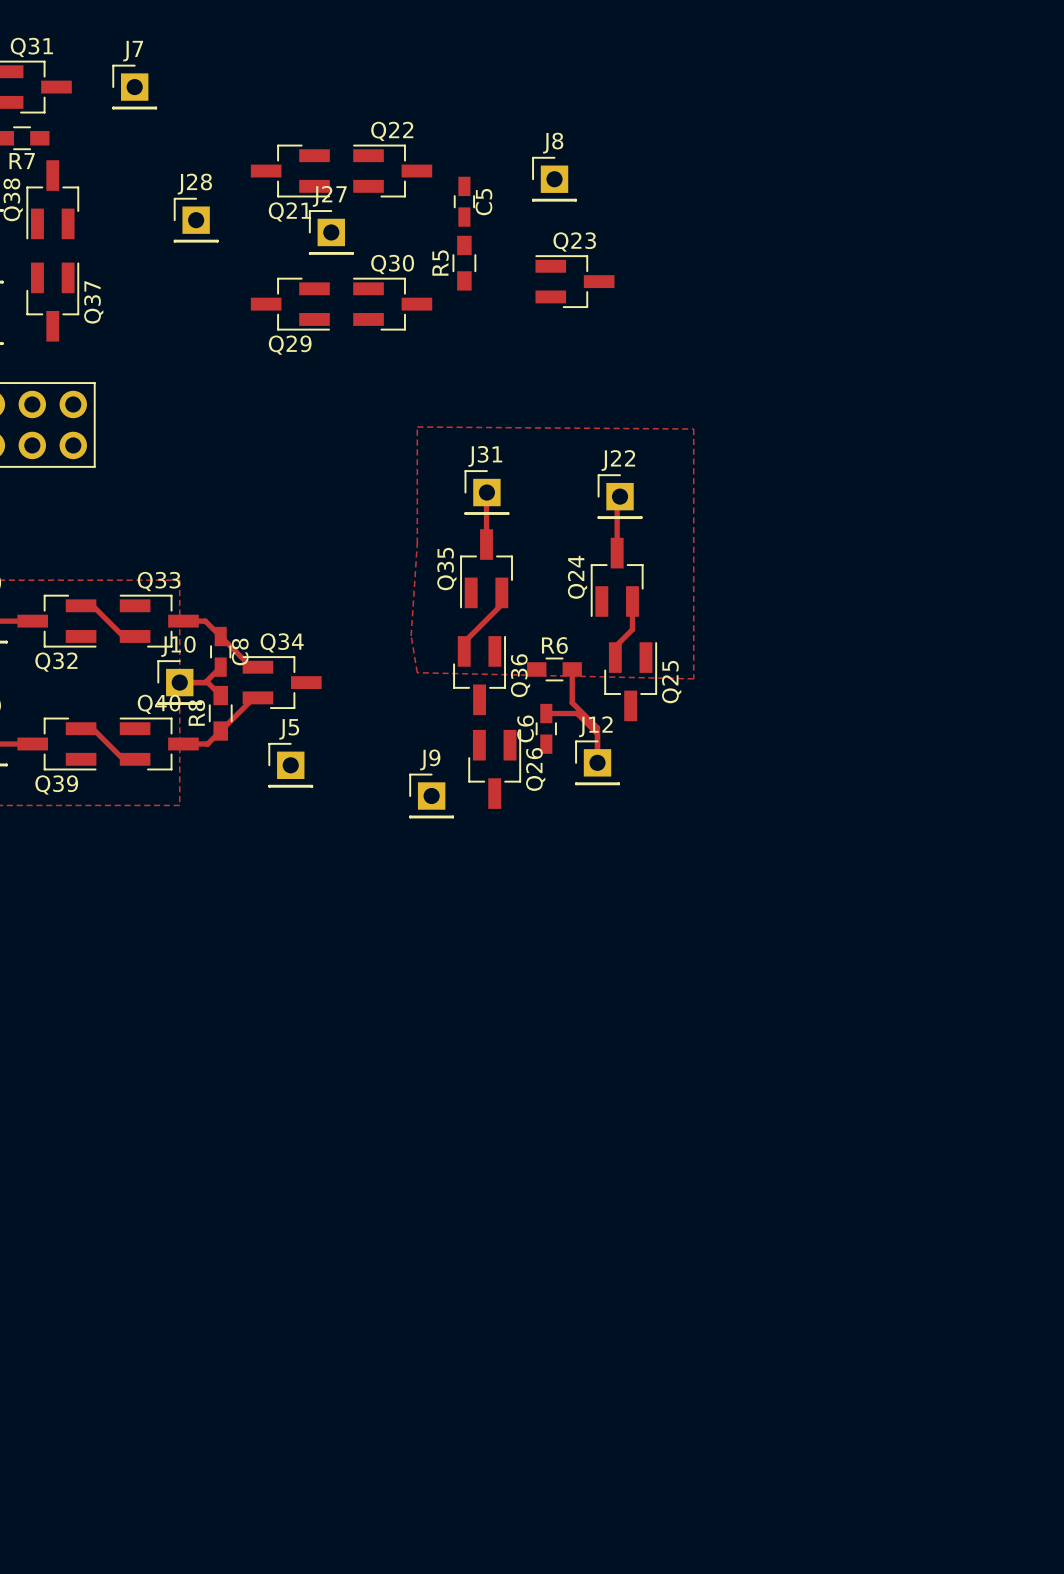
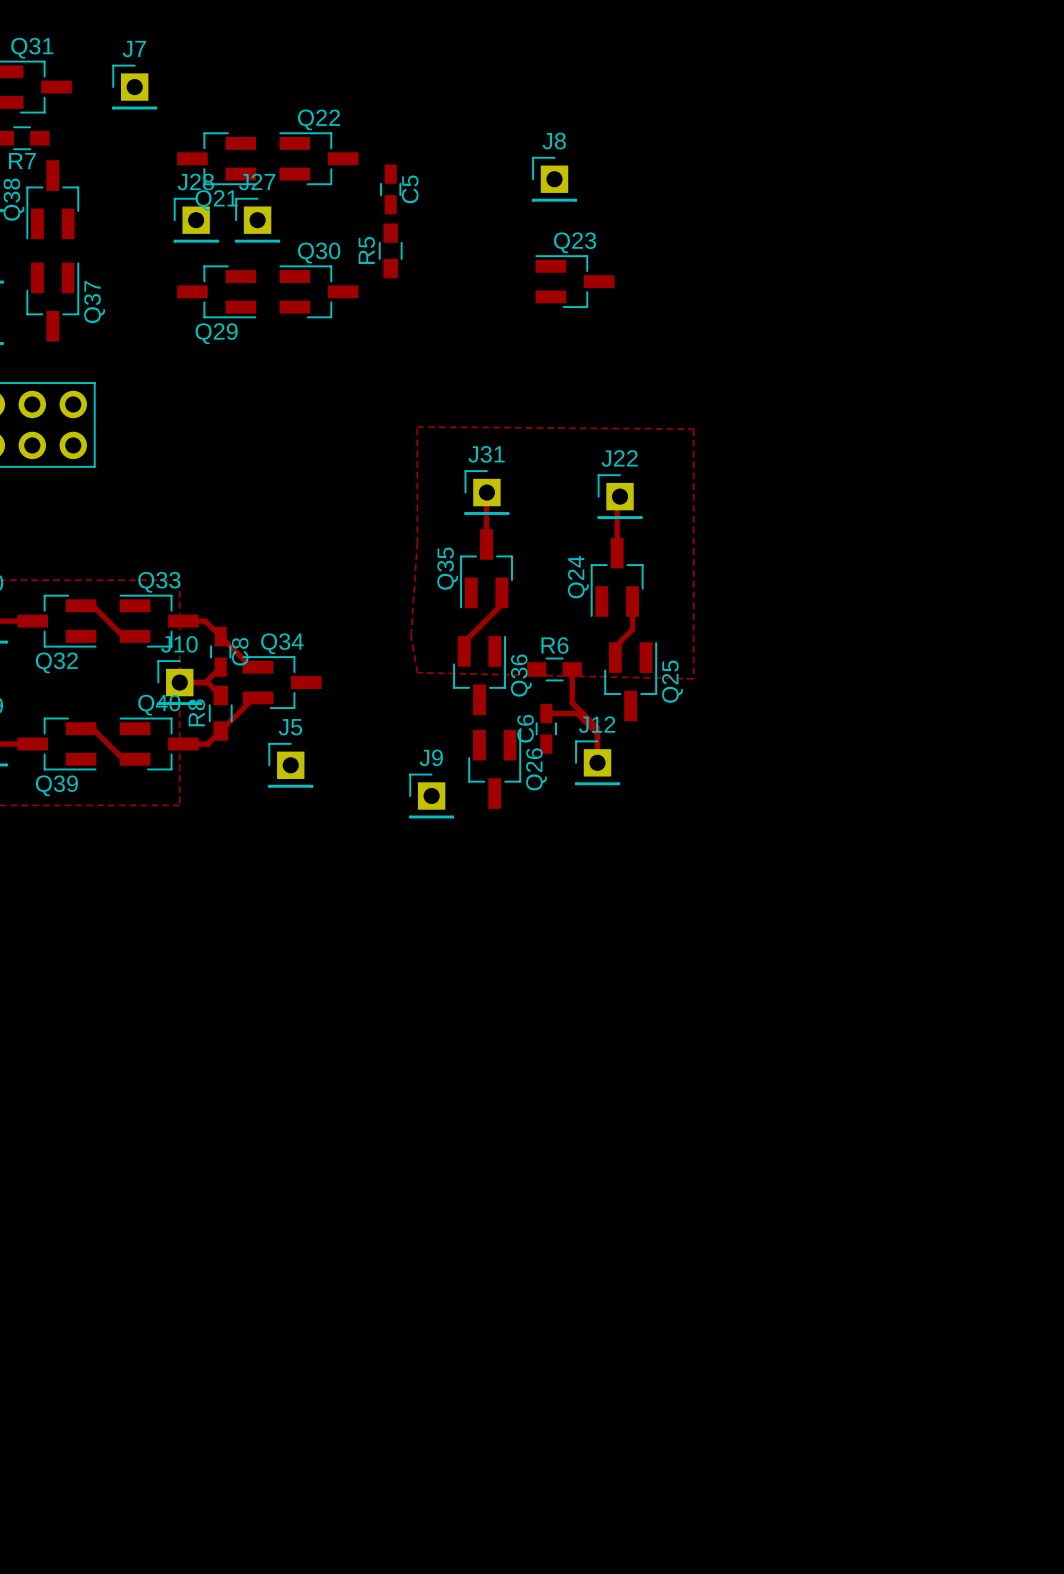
Q21 position: (290, 171) -> (216, 158)
Q22 position: (392, 171) -> (318, 158)
C5 position: (464, 201) -> (390, 189)
J27 position: (331, 232) -> (257, 220)
R5 position: (464, 263) -> (390, 250)
Q29 position: (290, 304) -> (216, 291)
Q30 position: (392, 304) -> (318, 291)

